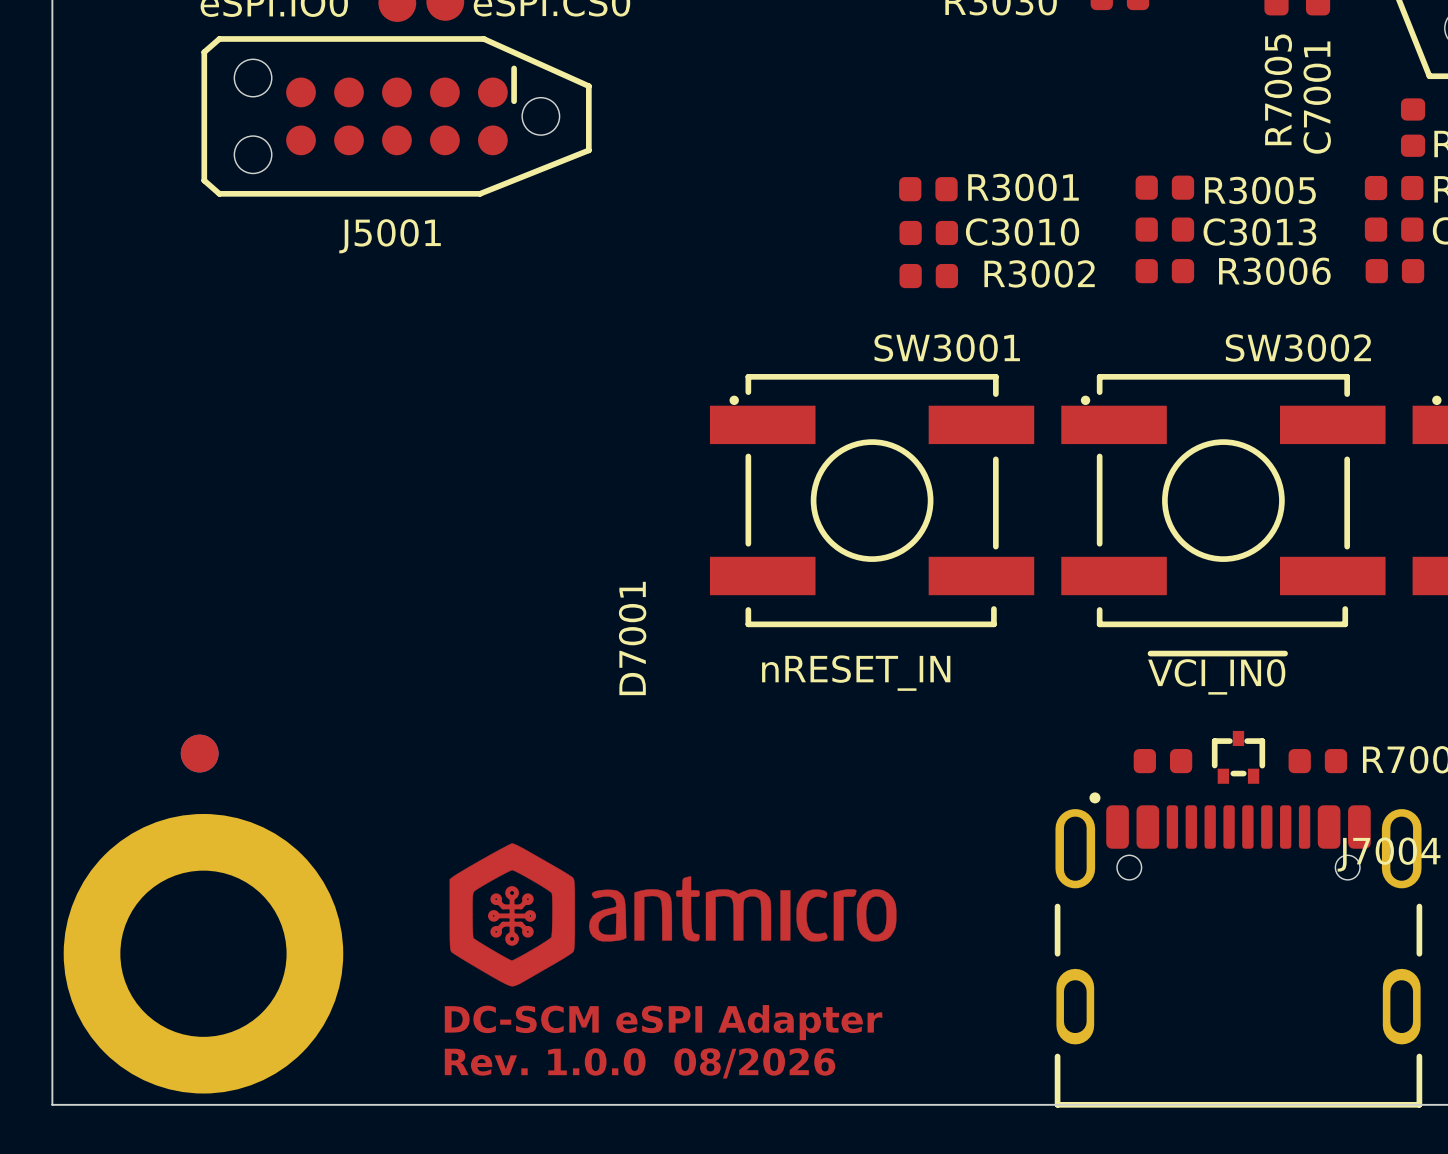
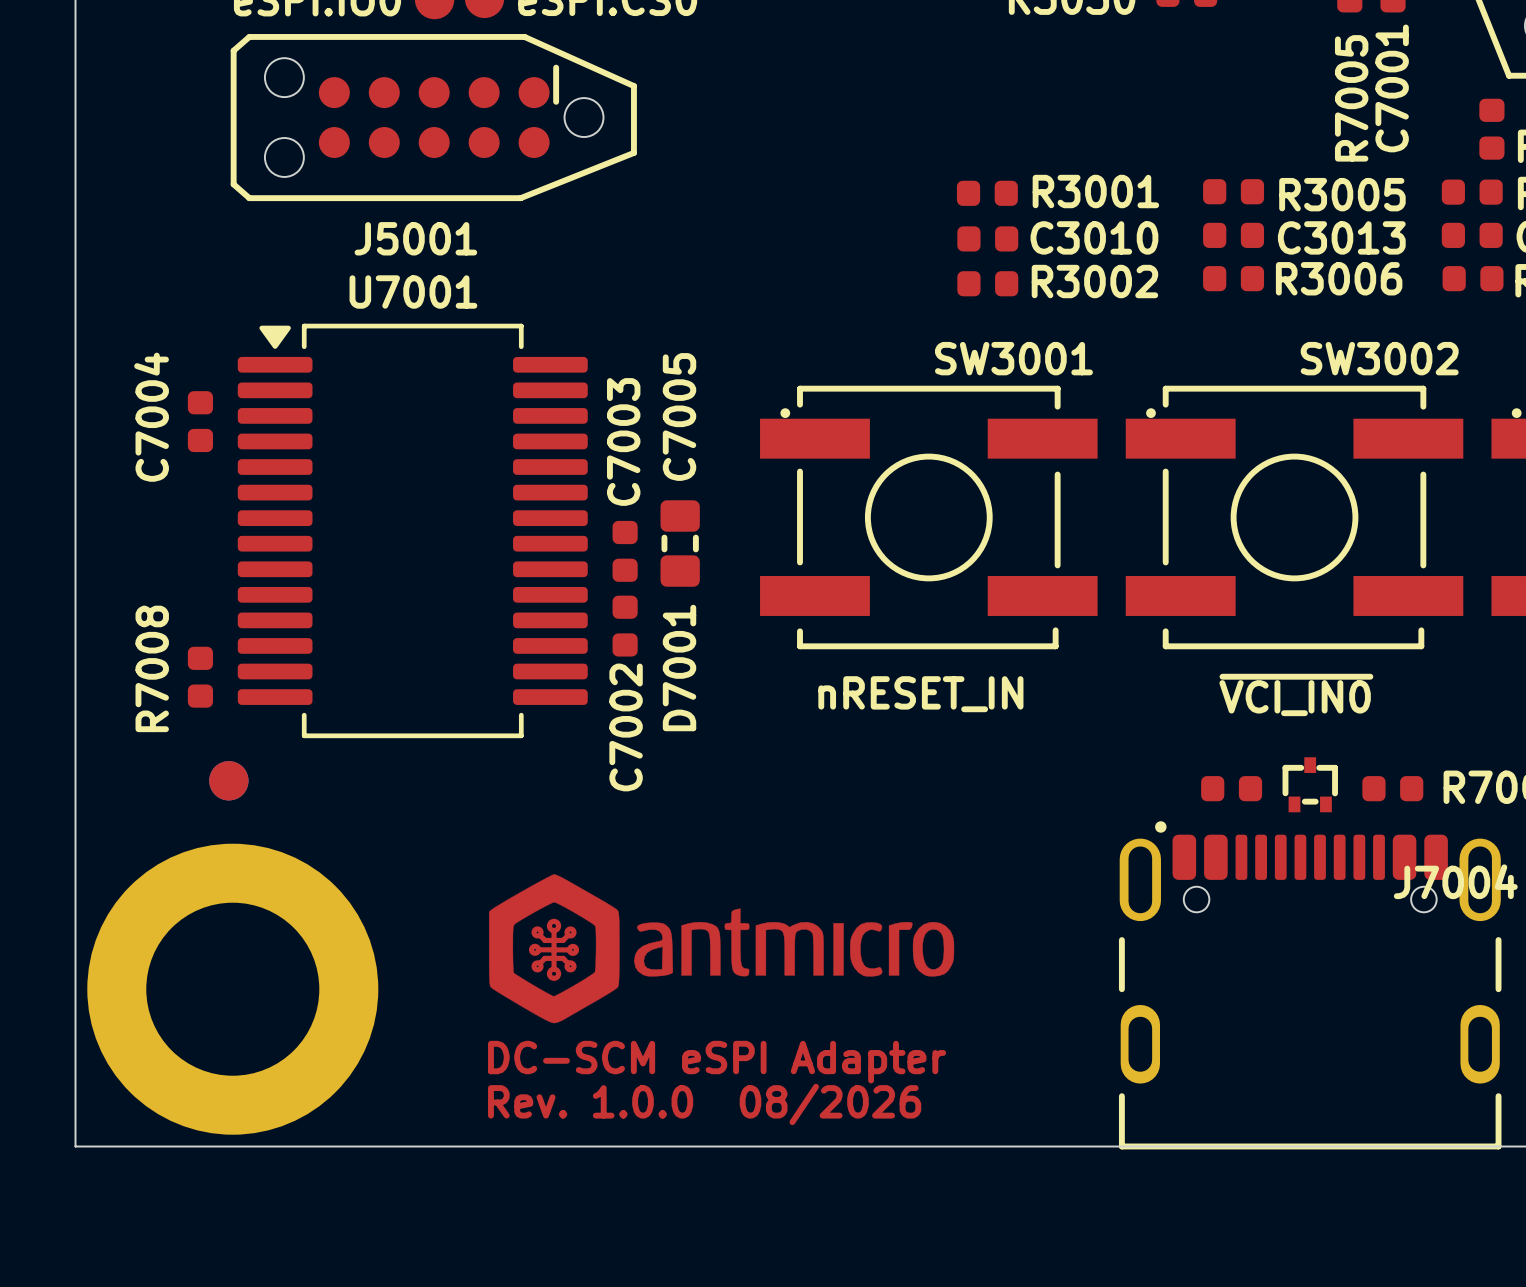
C7004: none -> (200, 421)
U7001: none -> (412, 530)
C7005: none -> (680, 543)
C7003: none -> (625, 551)
C7002: none -> (625, 626)
R7008: none -> (200, 677)

